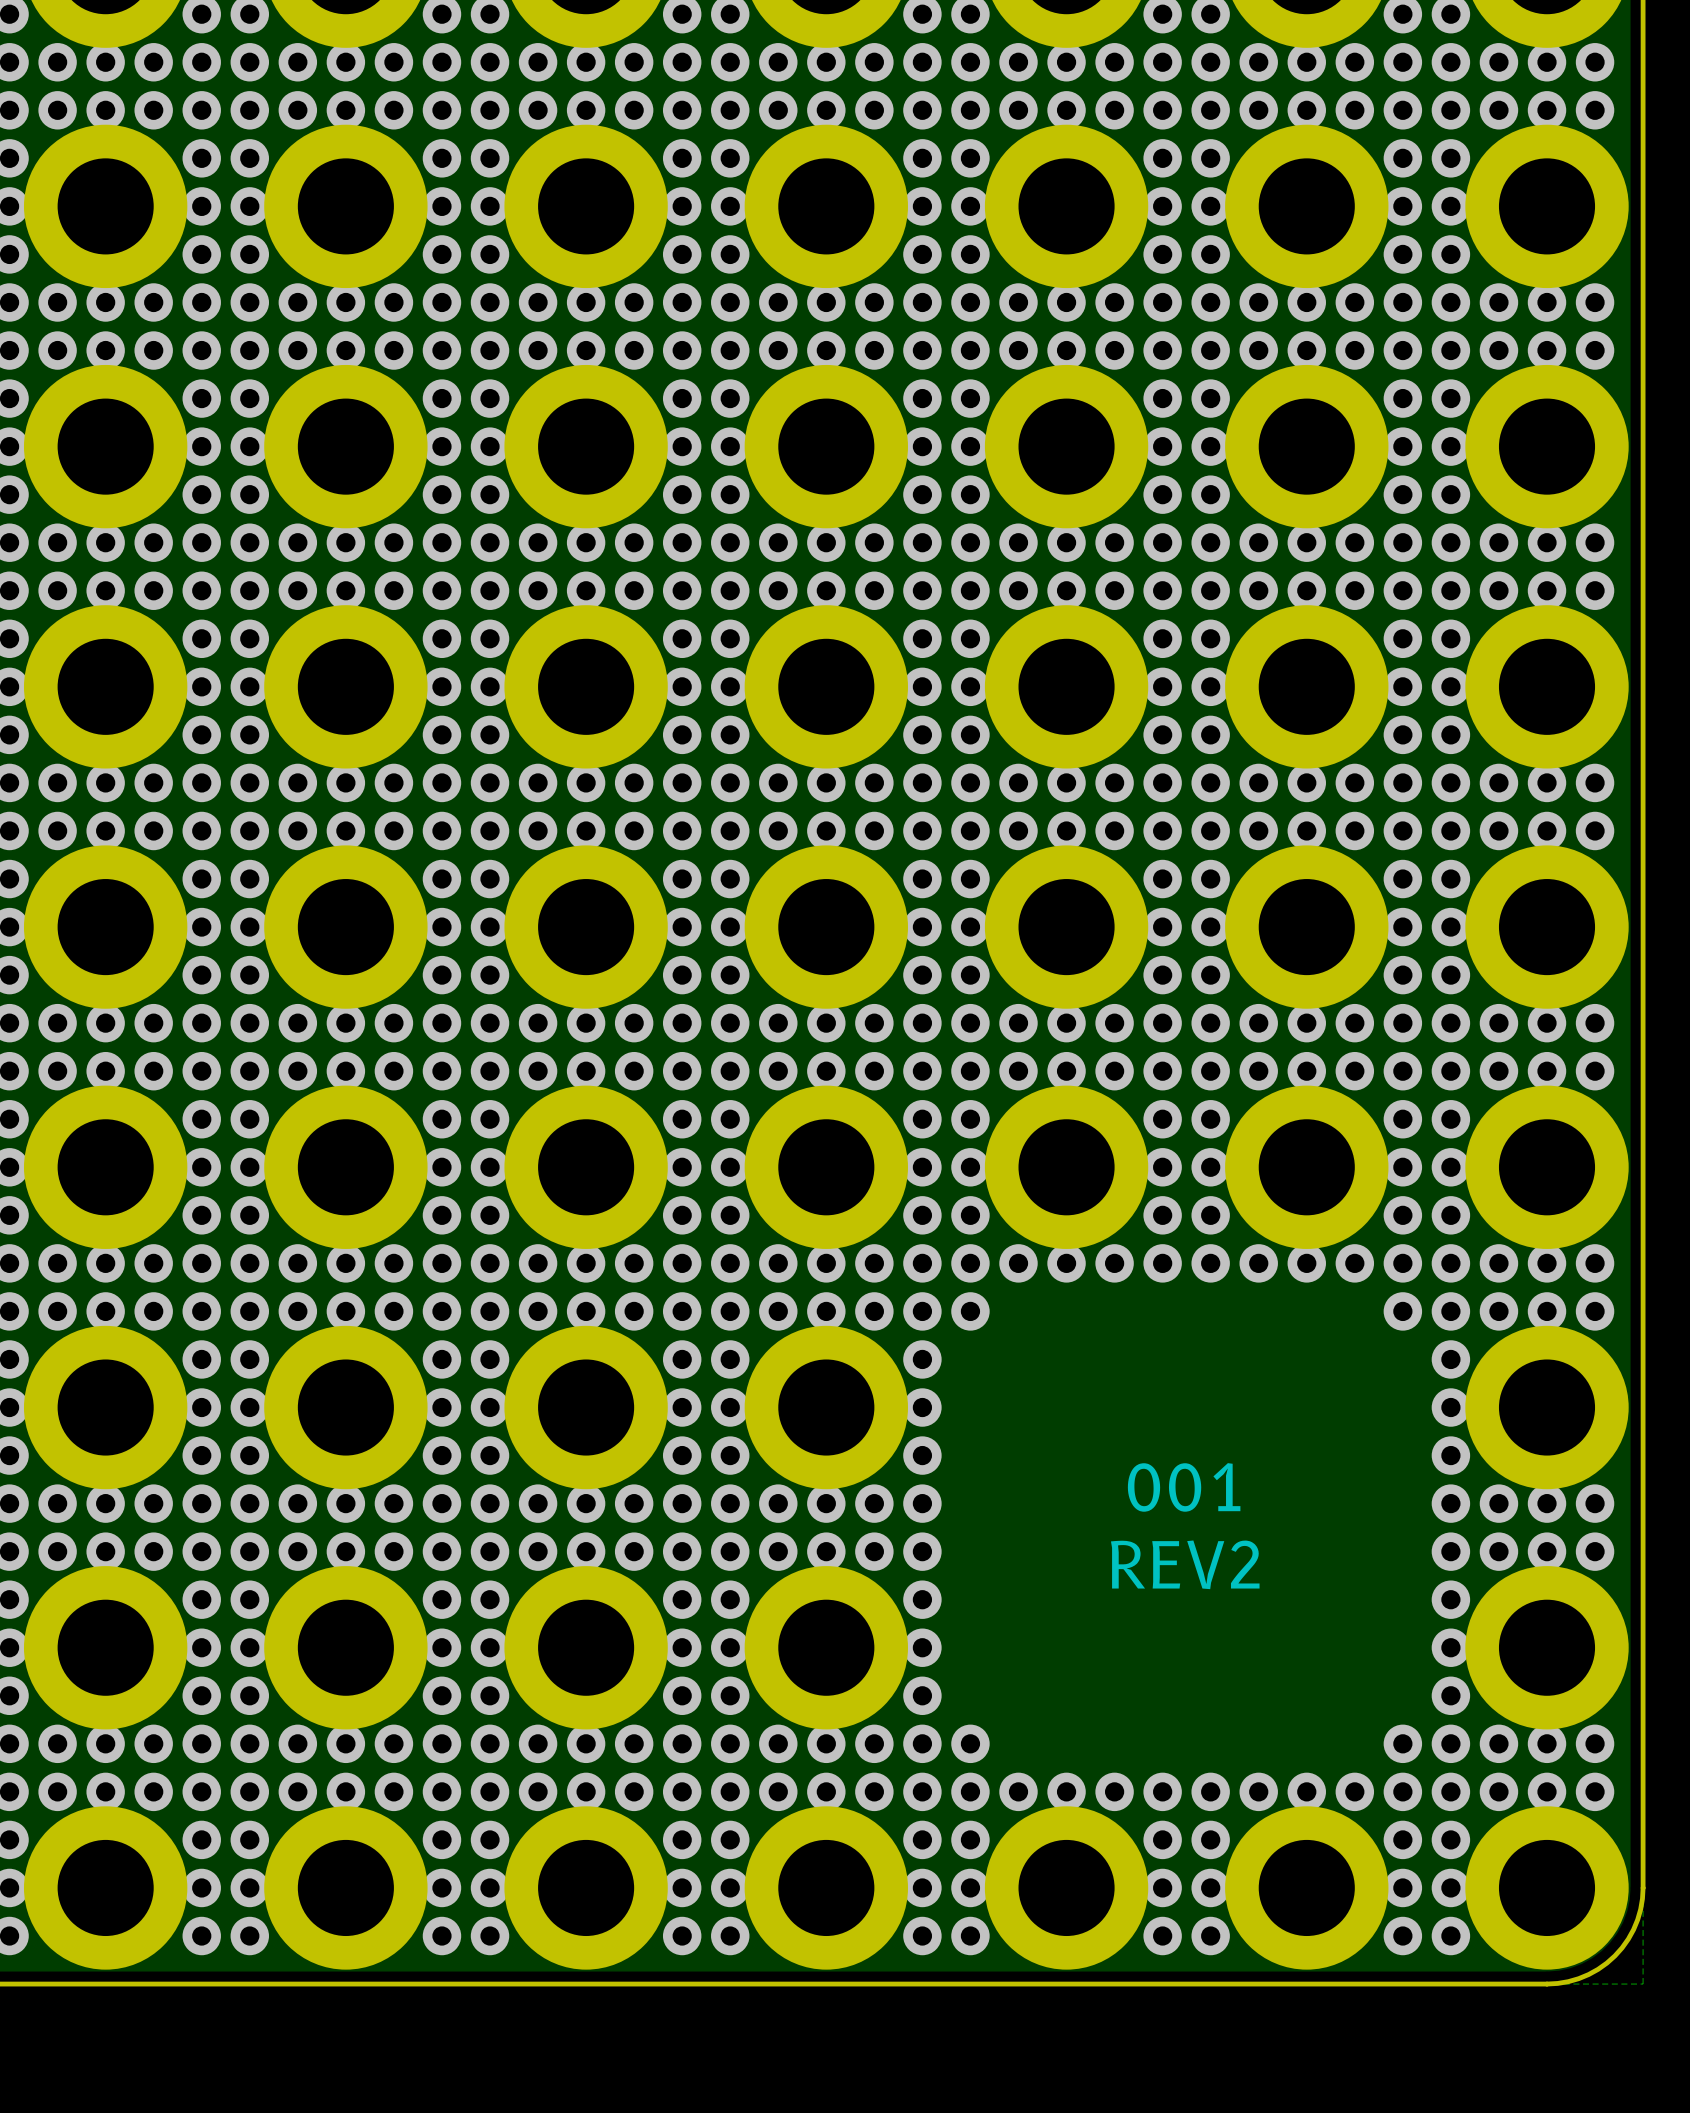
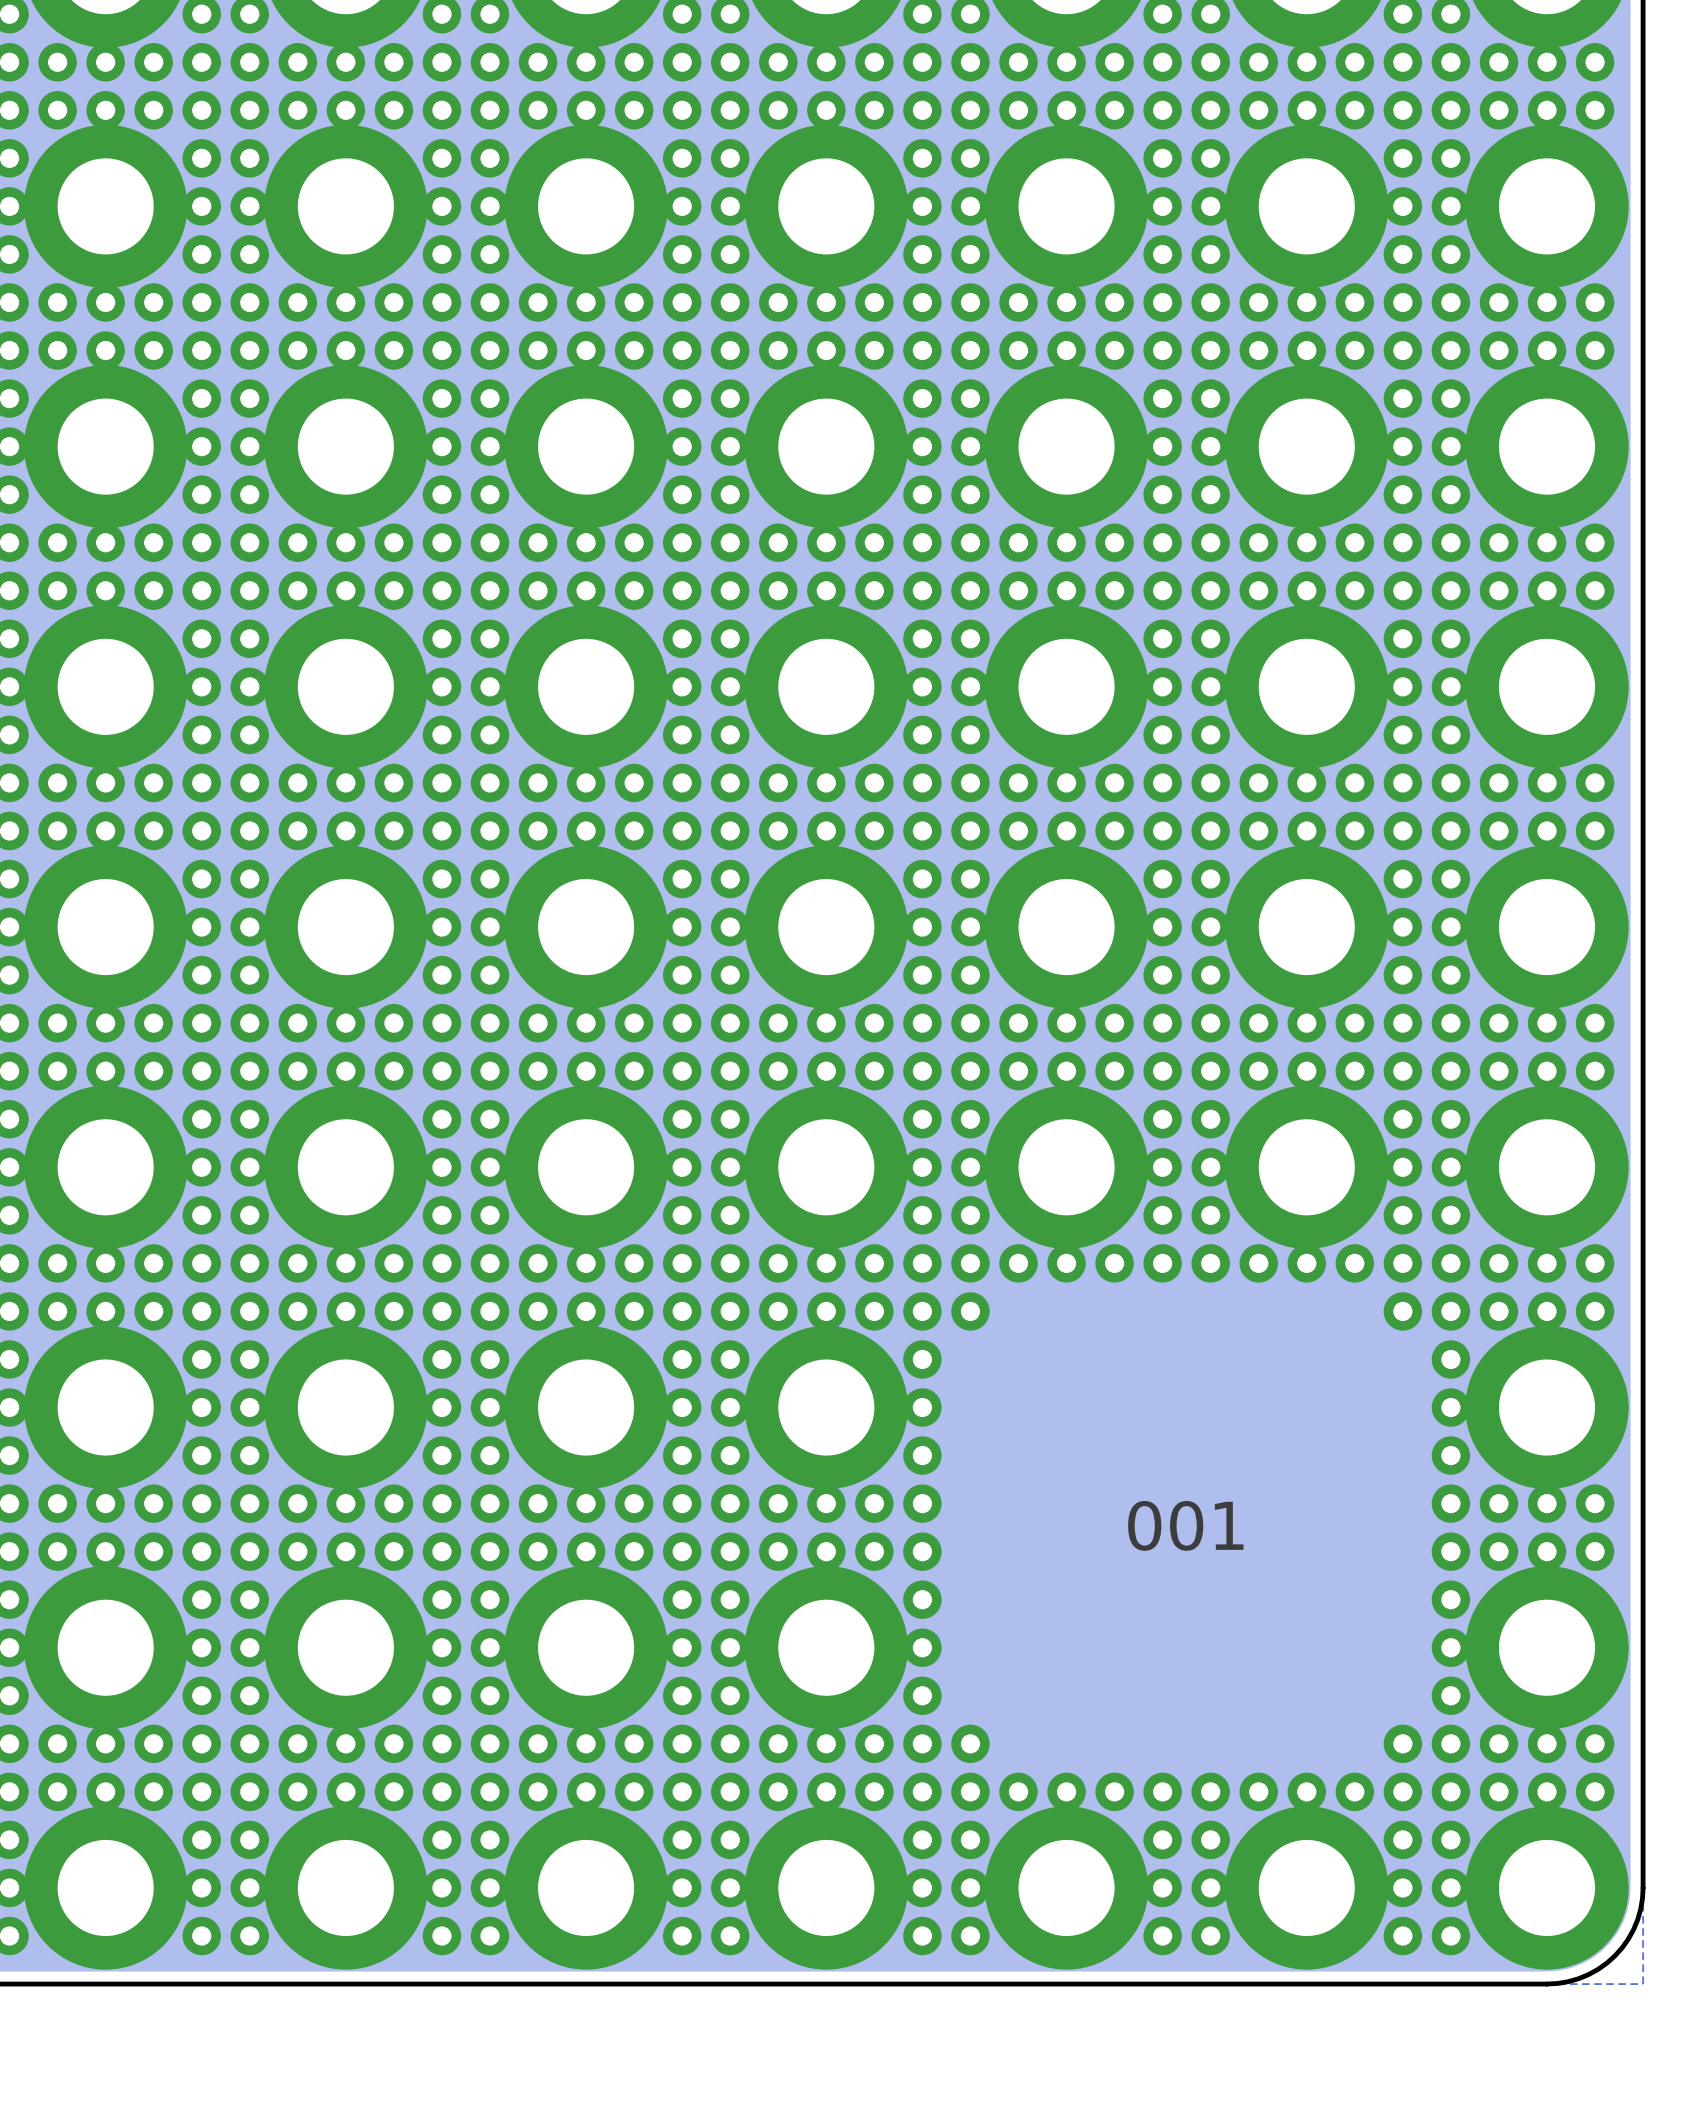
text position: 001 (1184, 1487) -> 001 (1185, 1525)
text: REV2 (1185, 1564) -> none

